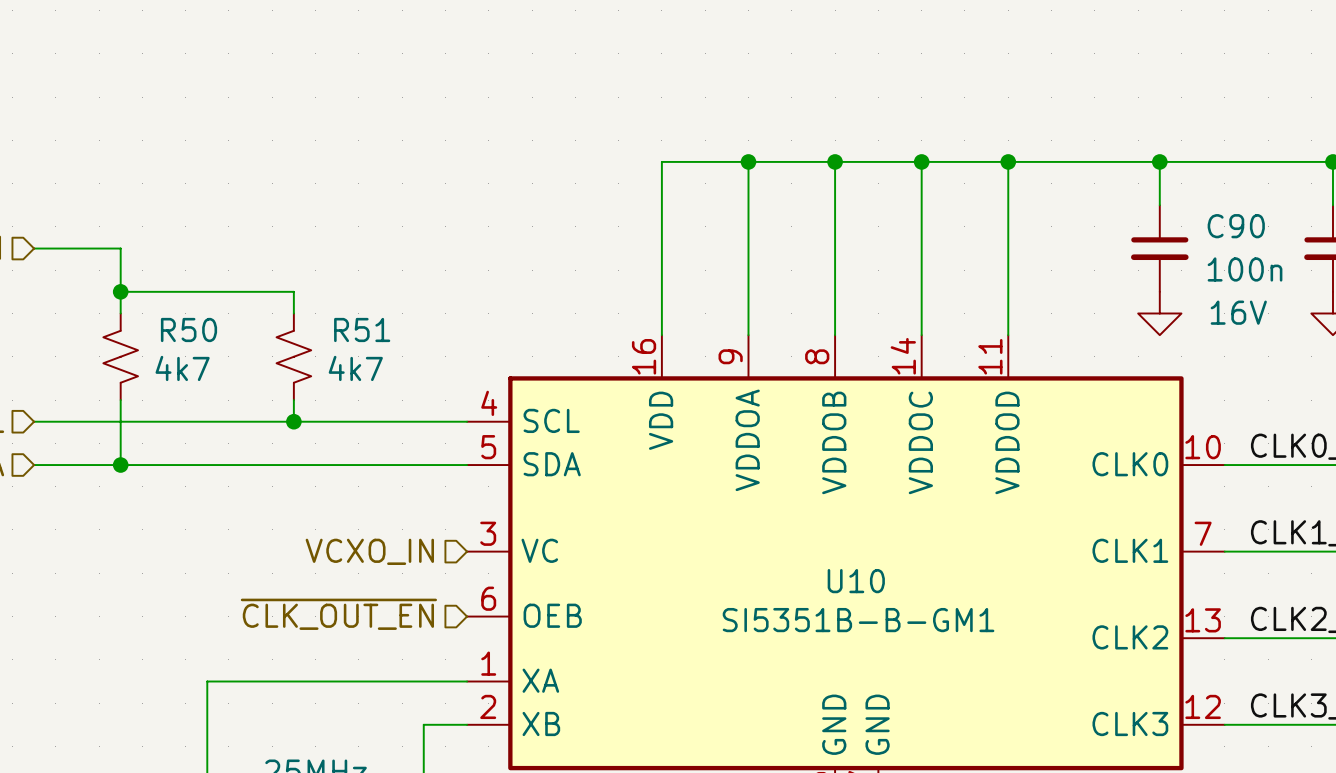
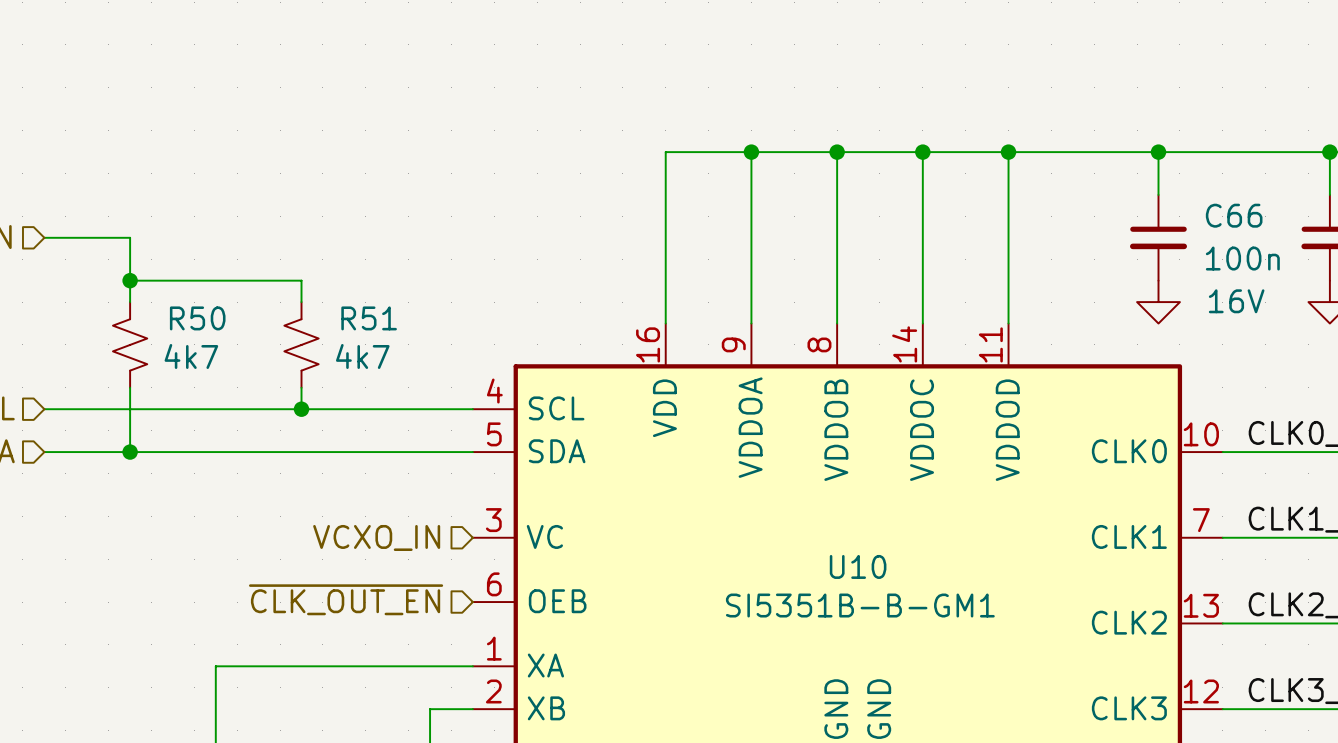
C90 name: C90 (1236, 226) -> C66 (1234, 215)

